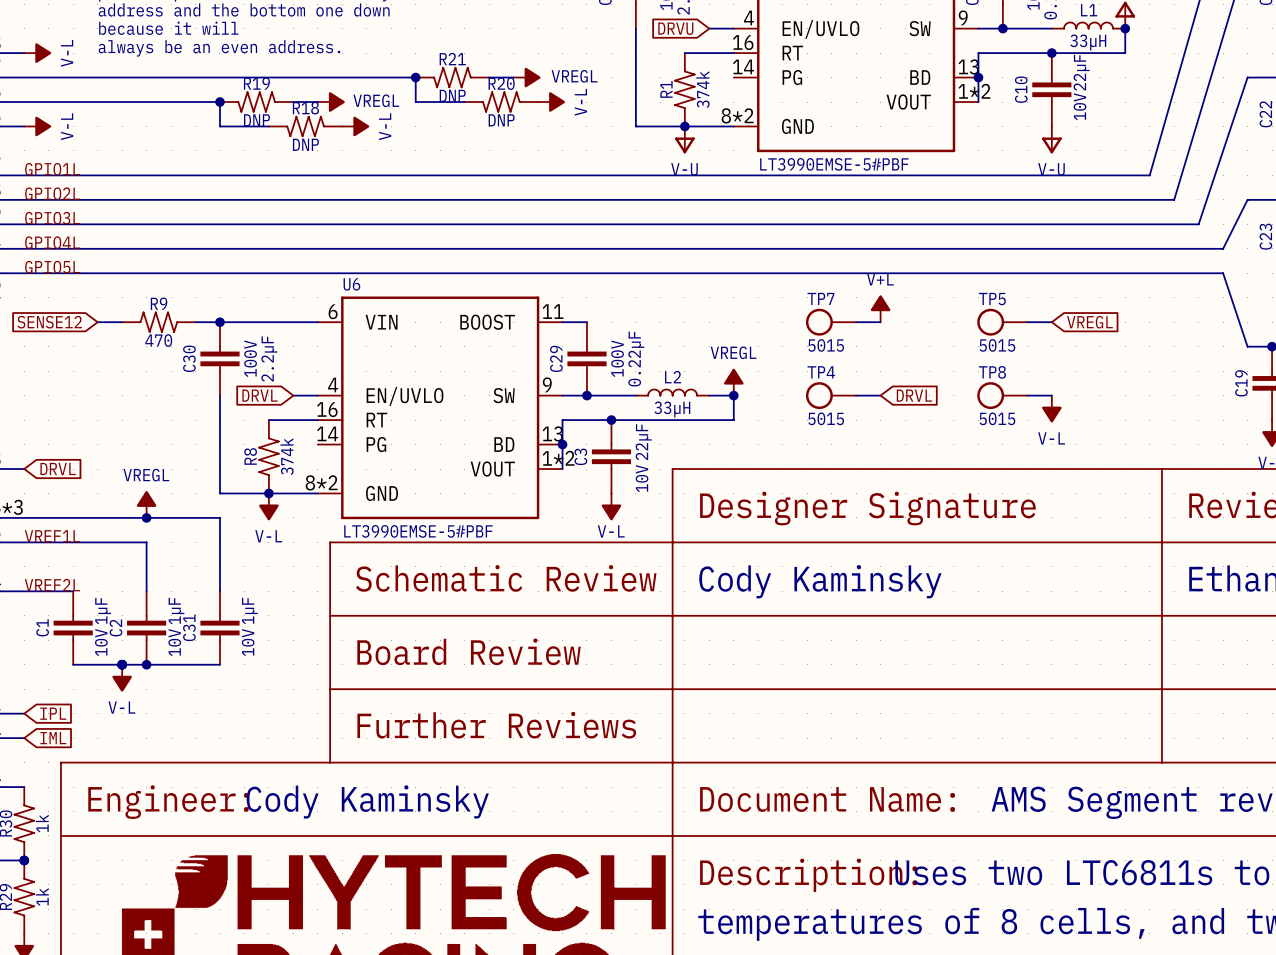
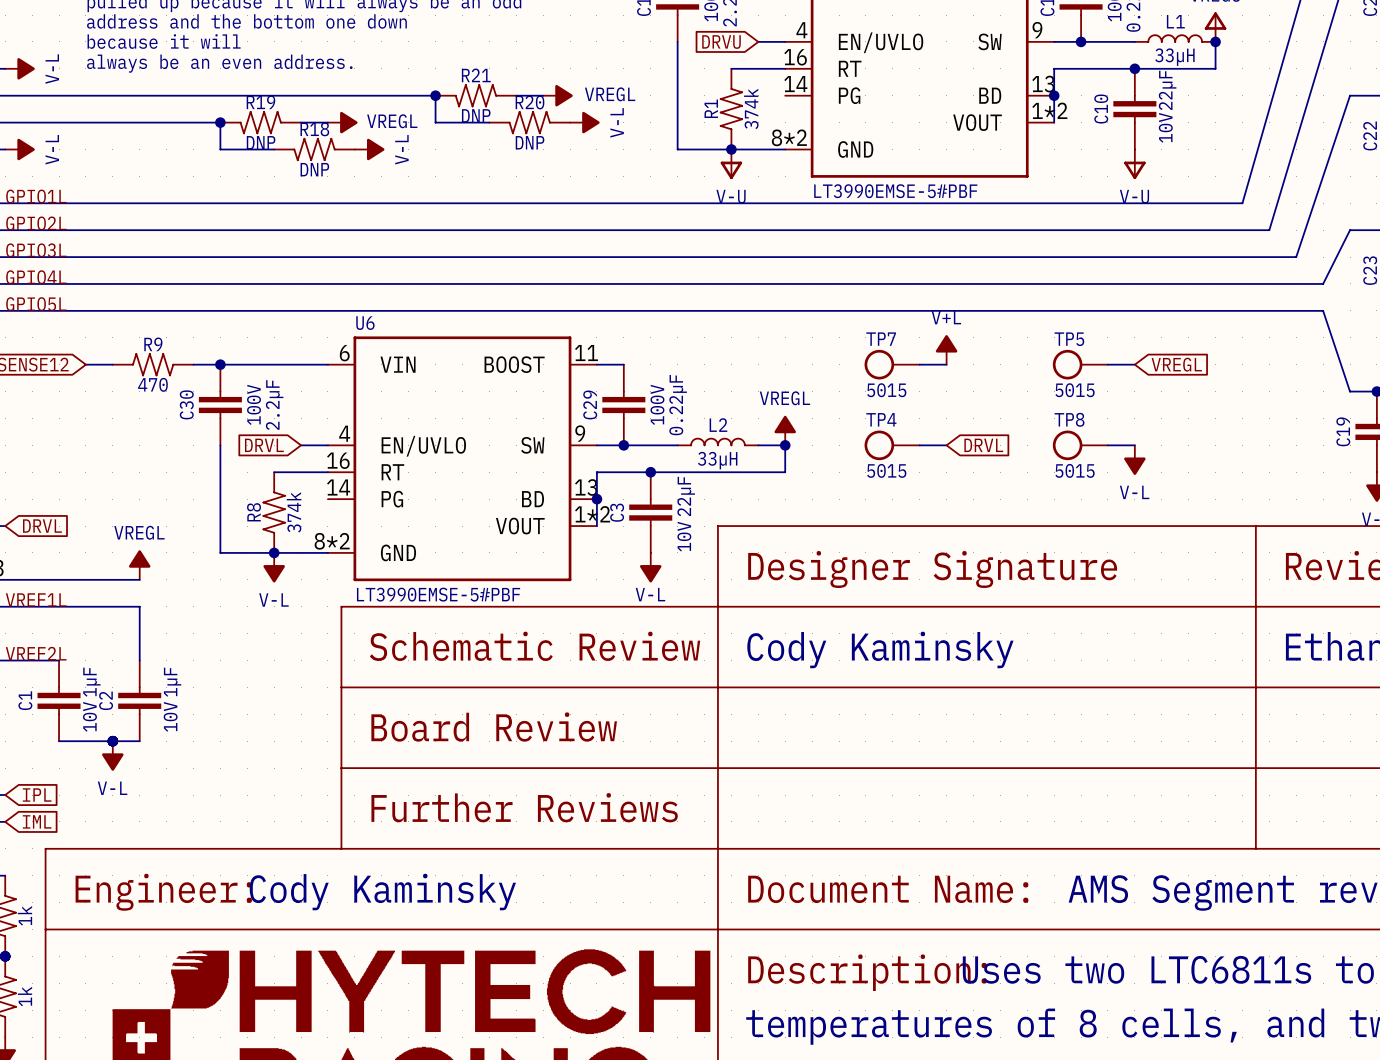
wire: (146, 517) (219, 517) (219, 591) -> none
junction: (146, 517) -> none
C31: (219, 628) -> none
wire: (146, 664) (219, 664) -> none
junction: (146, 664) -> none

